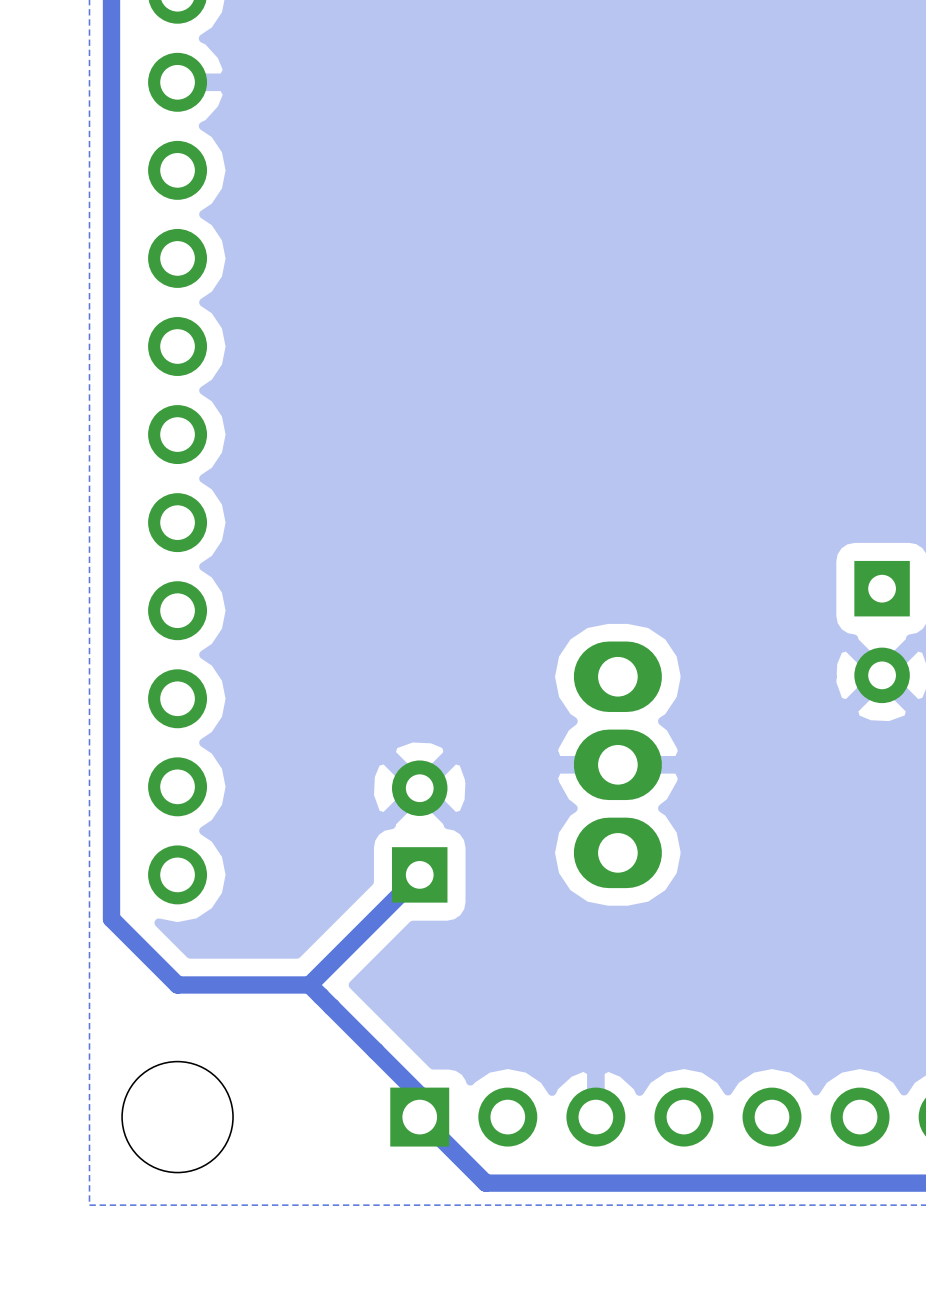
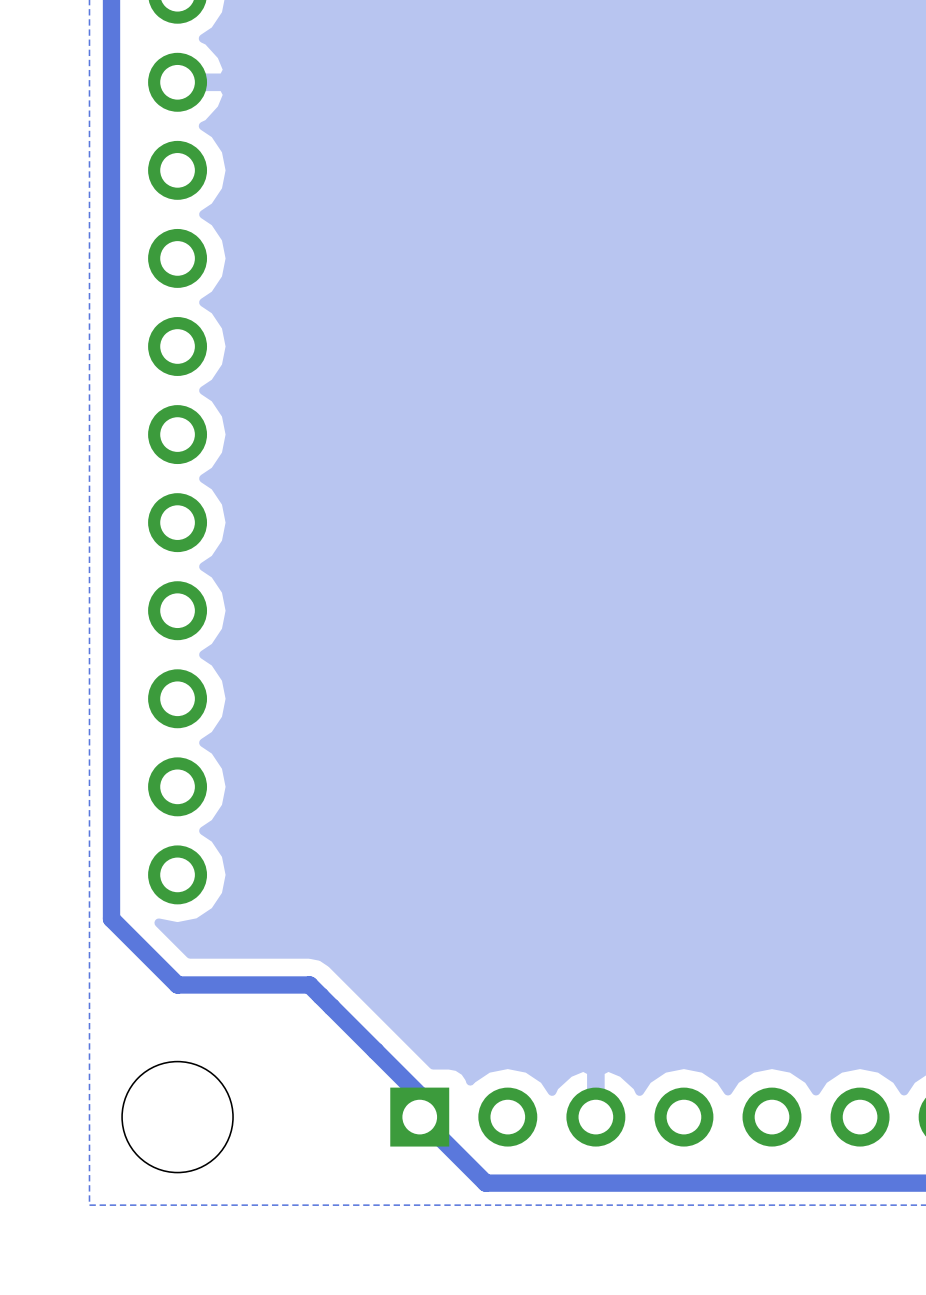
part: (882, 632) -> none
part: (617, 764) -> none
part: (419, 831) -> none
track: (419, 874) (309, 984) -> none

